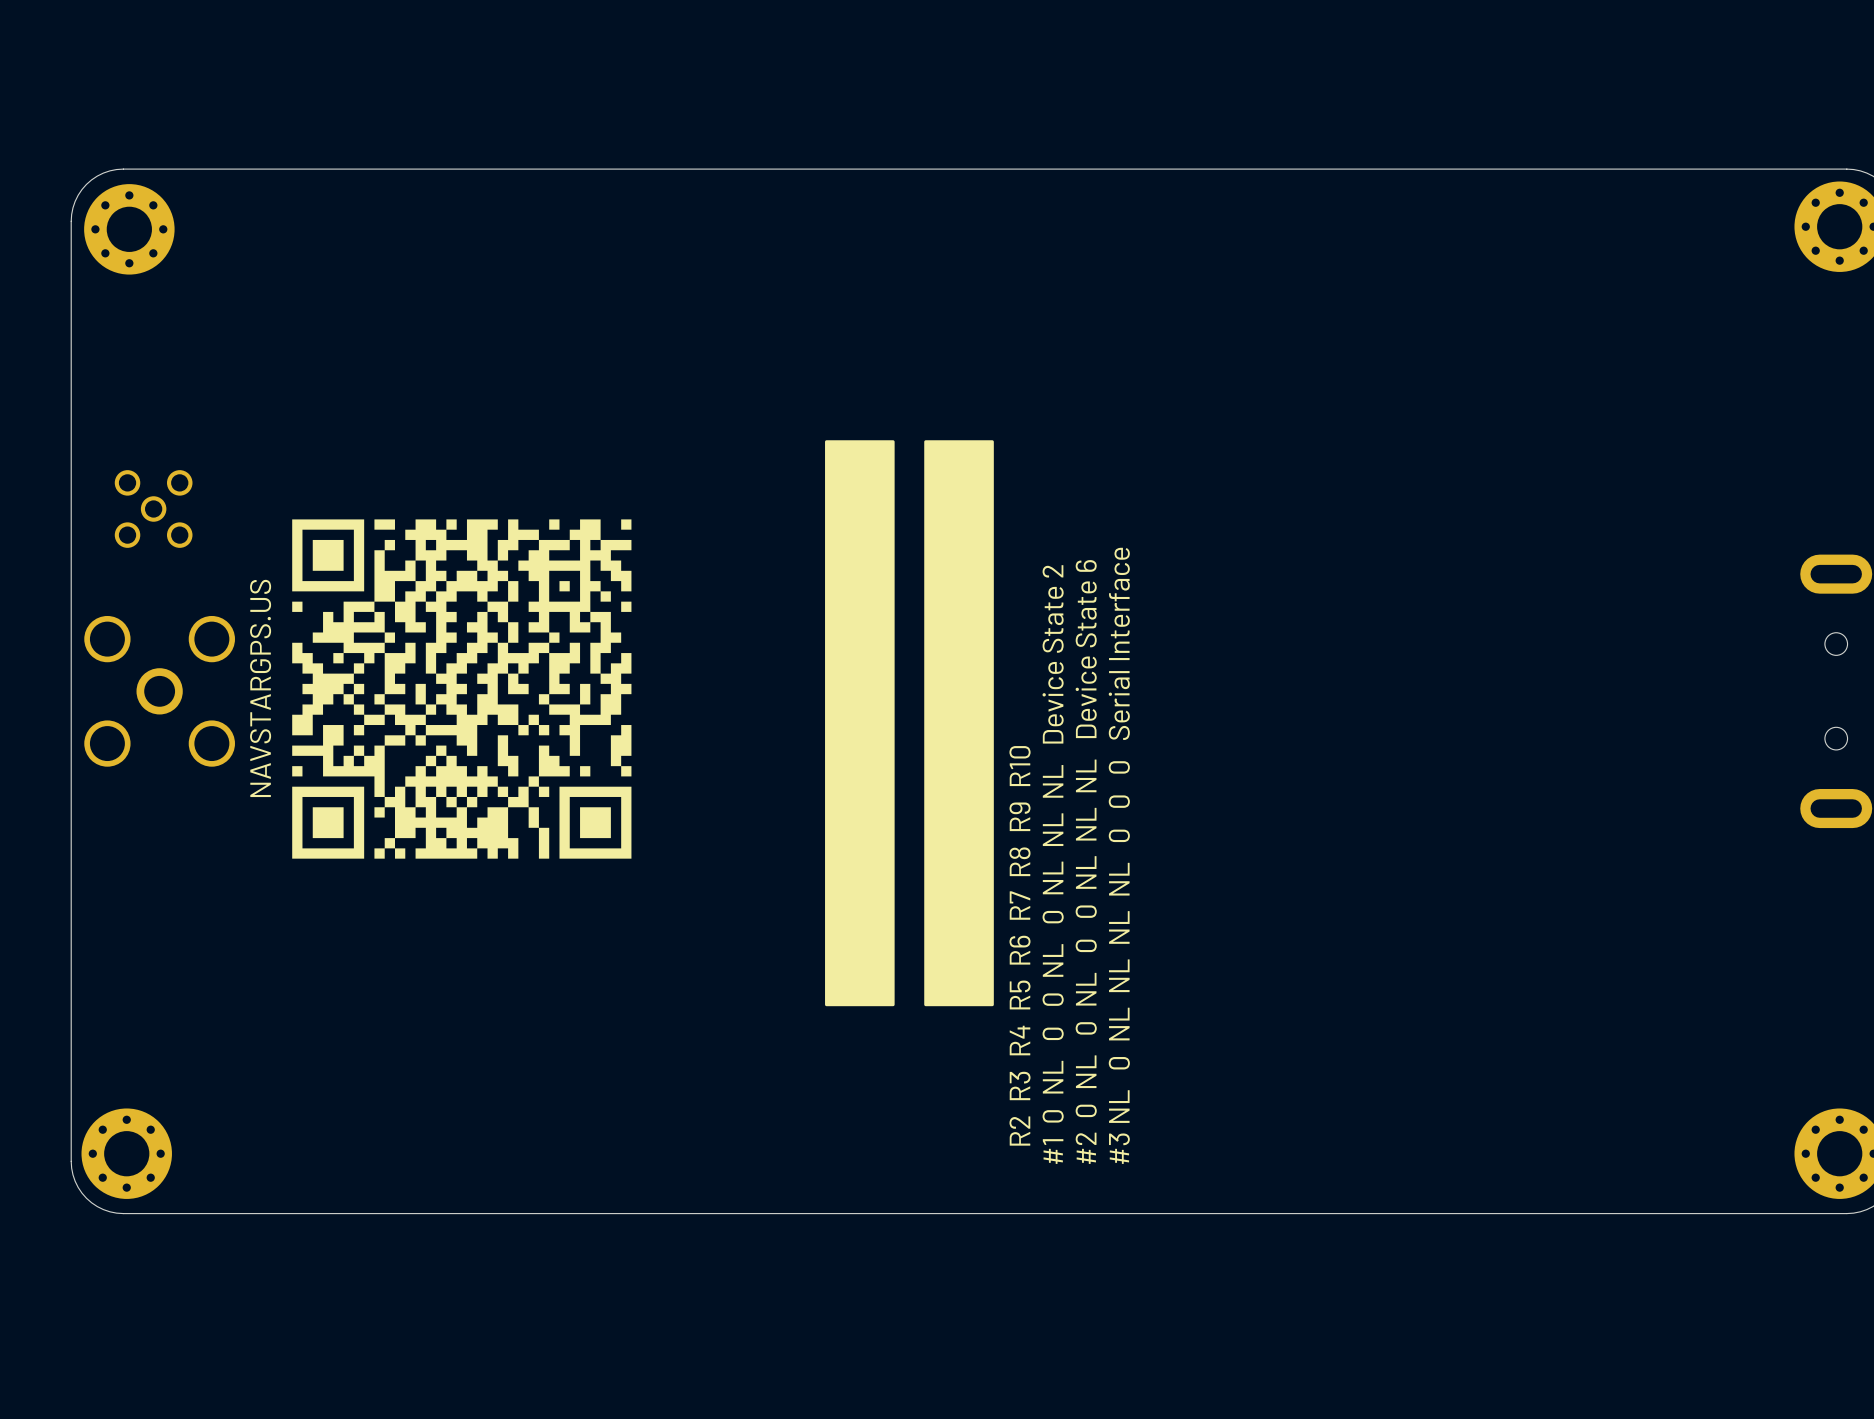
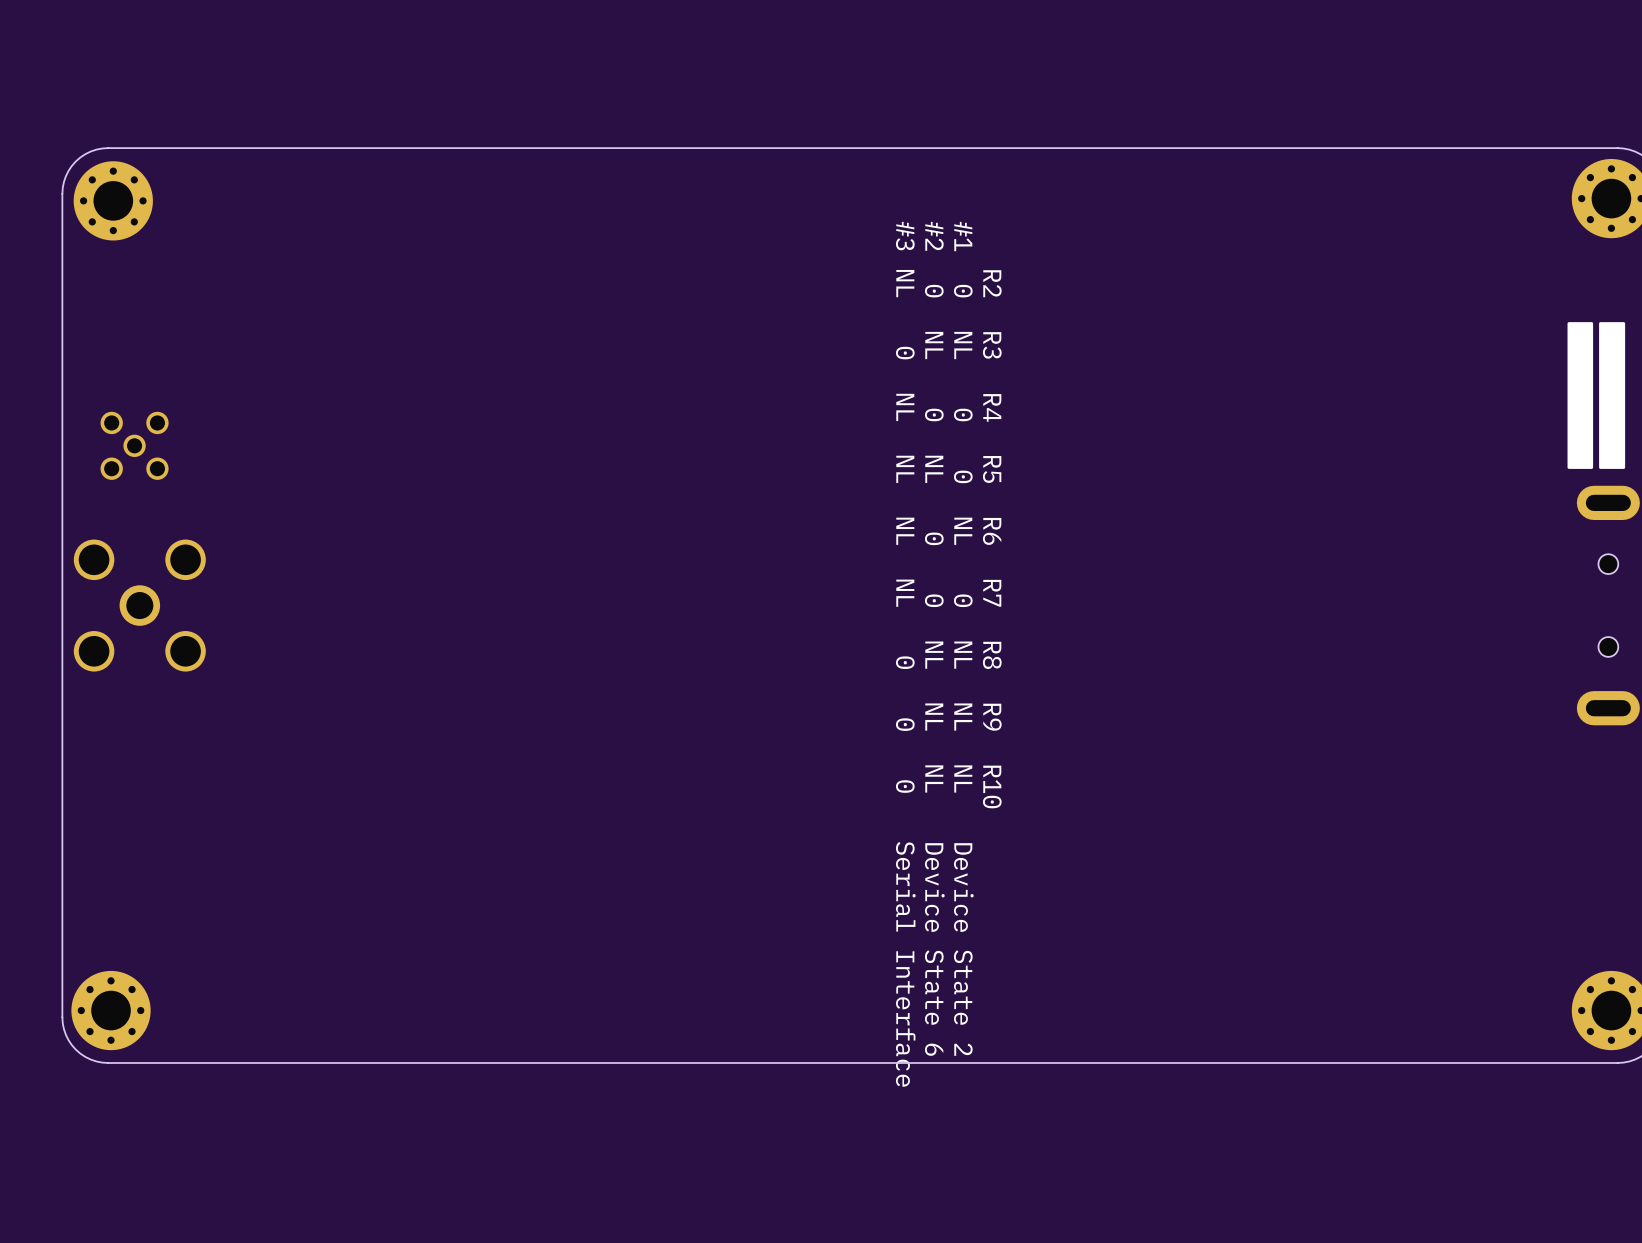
drawing: none -> [1567, 322, 1626, 469]
drawing: [825, 440, 895, 1007] -> none
drawing: [924, 440, 994, 1007] -> none
text: none -> R2 R3 R4 R5 R6 R7 R8 R9 R10 (992, 539)
drawing: [292, 519, 632, 859] -> none
text: none -> #1 0 NL 0 0 NL 0 NL NL NL Device State 2 (963, 638)
text: none -> #2 0 NL 0 NL 0 0 NL NL NL Device State 6 (934, 638)
text: none -> #3 NL 0 NL NL NL NL 0 0 0 Serial Interface (905, 654)
text: #3 NL 0 NL NL NL NL 0 0 0 Serial Interface (1119, 855) -> none
text: #2 0 NL 0 NL 0 0 NL NL NL Device State 6 (1086, 862) -> none
text: #1 0 NL 0 0 NL 0 NL NL NL Device State 2 (1053, 864) -> none
text: R2 R3 R4 R5 R6 R7 R8 R9 R10 (1020, 945) -> none

